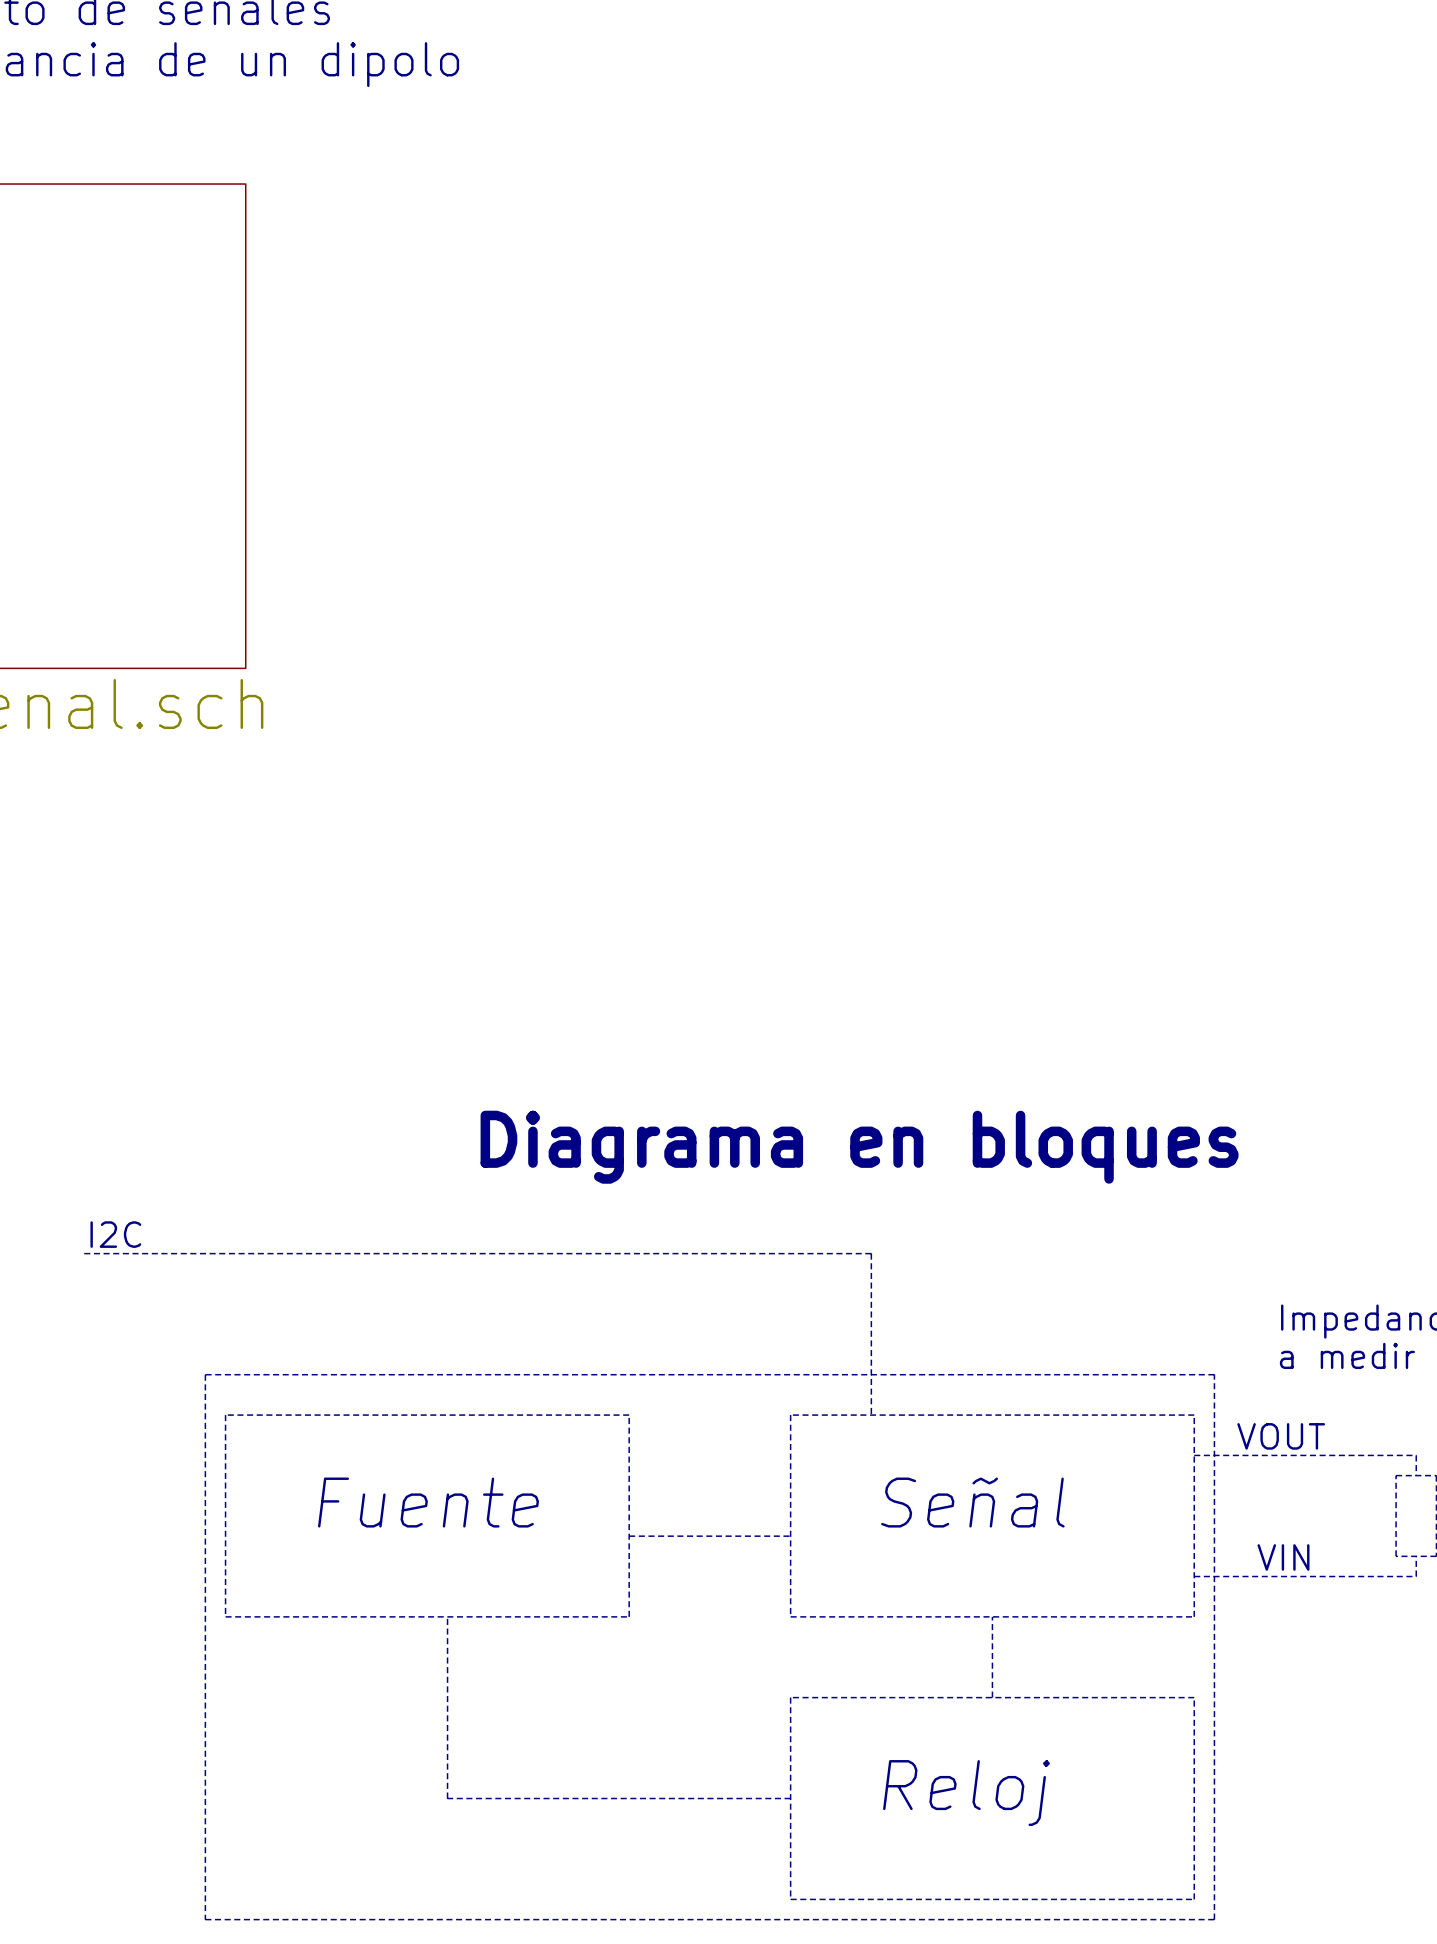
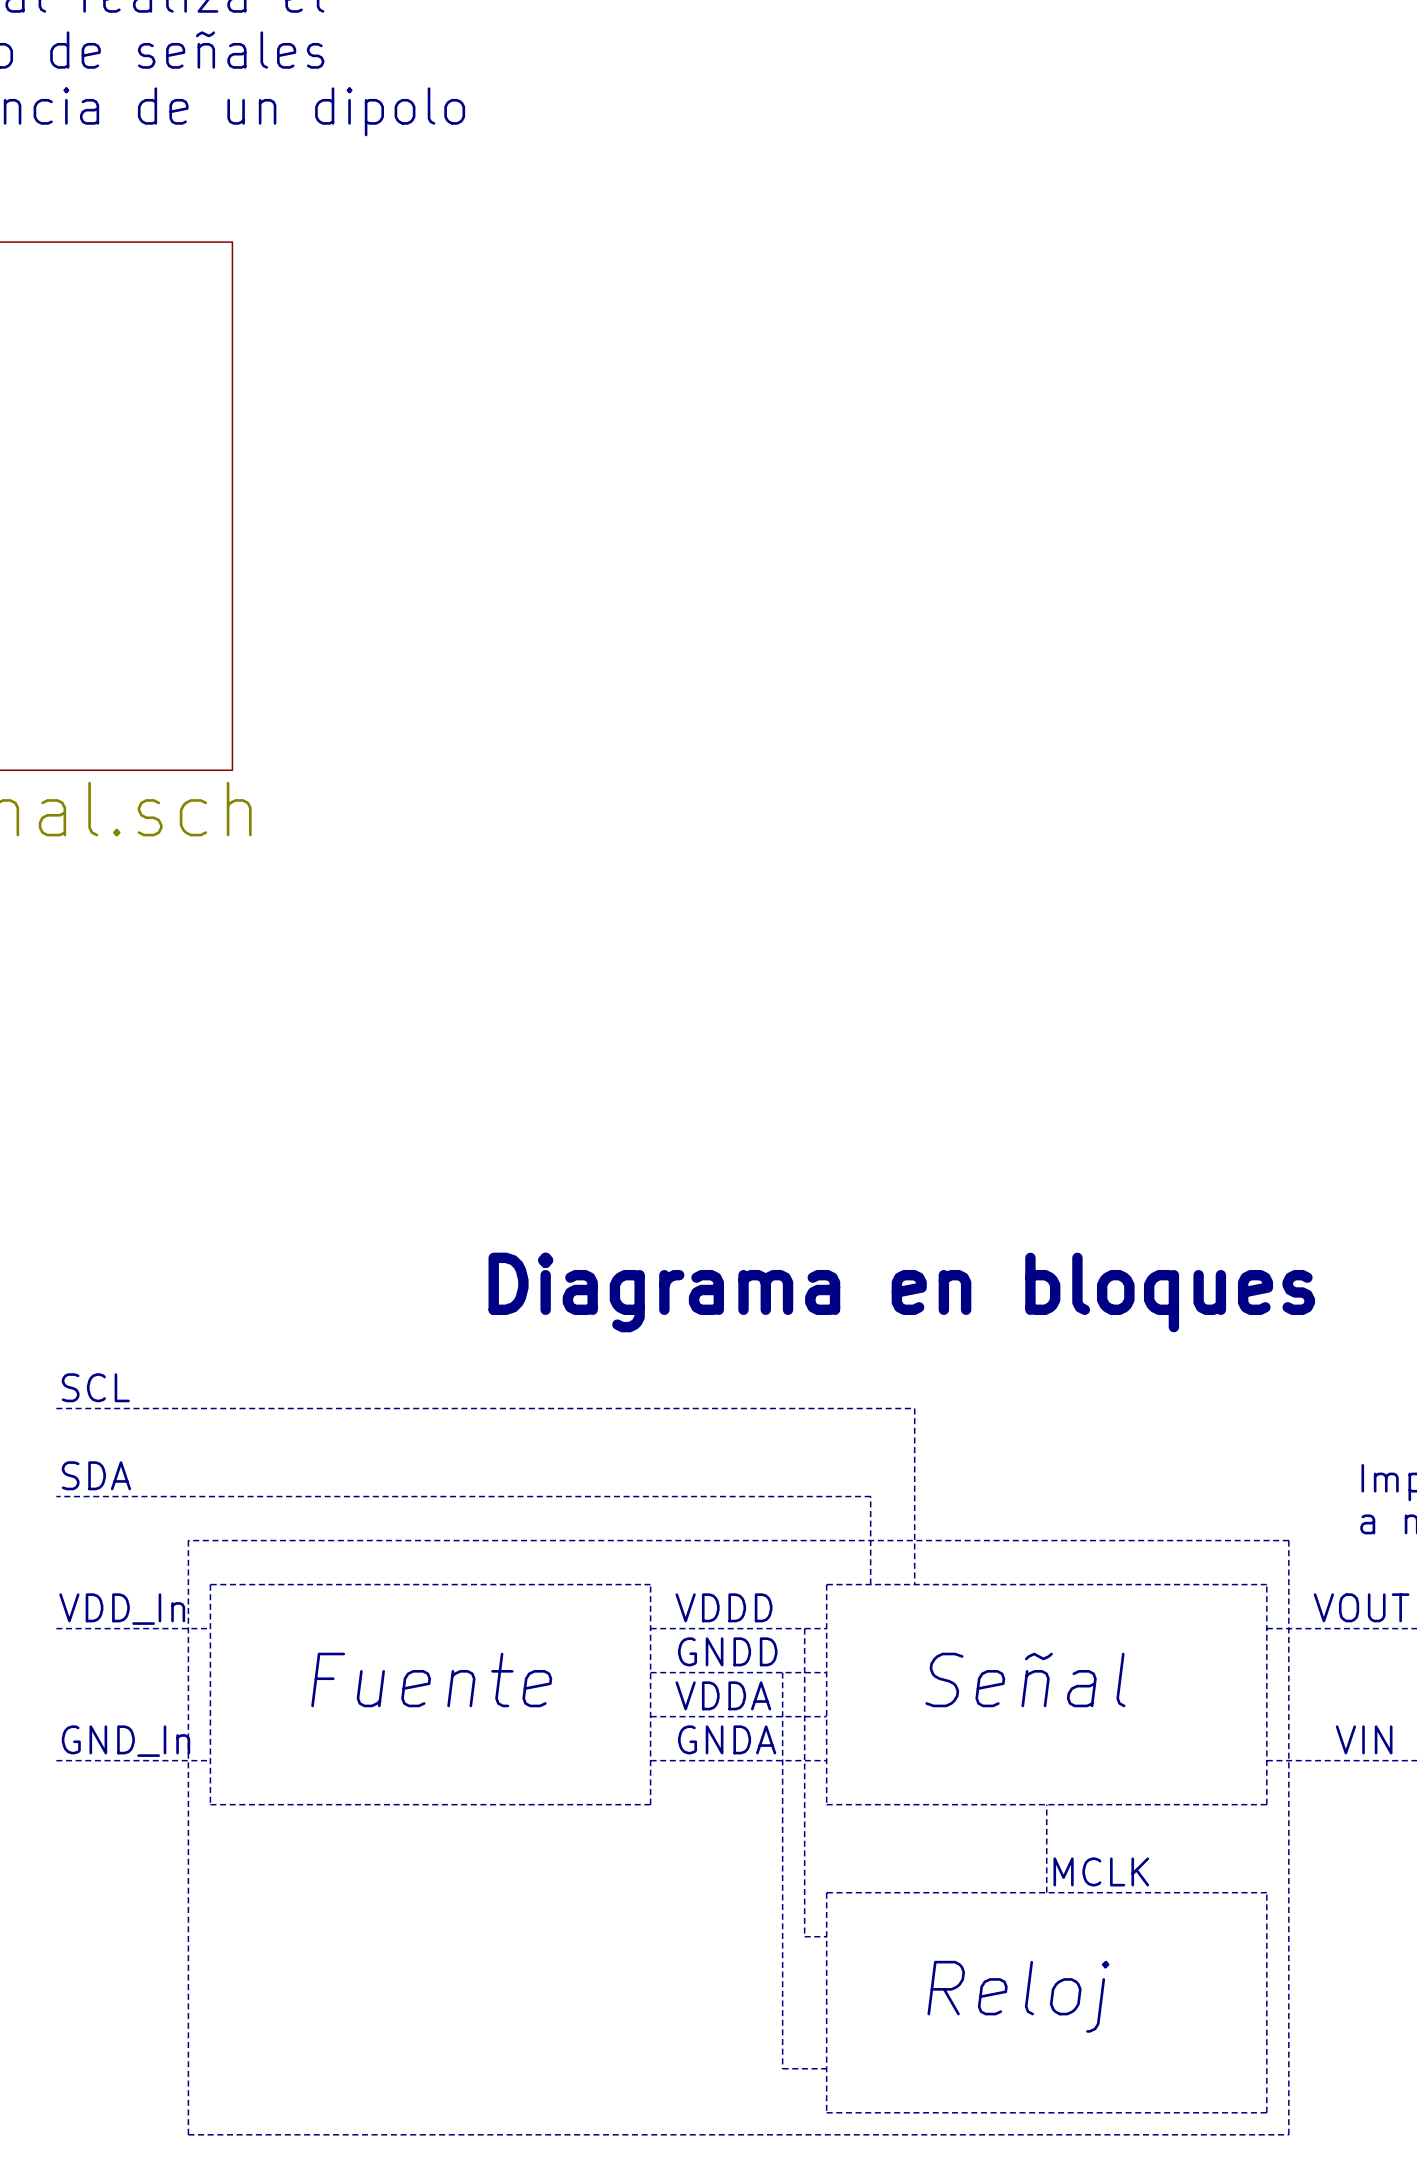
text: I2C (115, 1234) -> SCL (95, 1387)
text: none -> SDA (96, 1475)
line: none -> (56, 1496) (870, 1496) (870, 1584)
text: none -> VDDD (724, 1607)
text: none -> VDD_In (122, 1609)
line: none -> (56, 1628) (210, 1628)
line: none -> (650, 1628) (826, 1628)
line: none -> (804, 1628) (804, 1936) (826, 1936)
text: none -> GNDD (727, 1651)
line: none -> (650, 1672) (826, 1672)
line: none -> (782, 1672) (782, 2068) (826, 2068)
text: none -> VDDA (723, 1695)
text: none -> GNDA (727, 1739)
text: none -> GND_In (126, 1741)
line: none -> (56, 1760) (210, 1760)
line: none -> (650, 1760) (826, 1760)
line: (447, 1616) (447, 1798) (790, 1798) -> none
text: none -> MCLK (1101, 1871)

